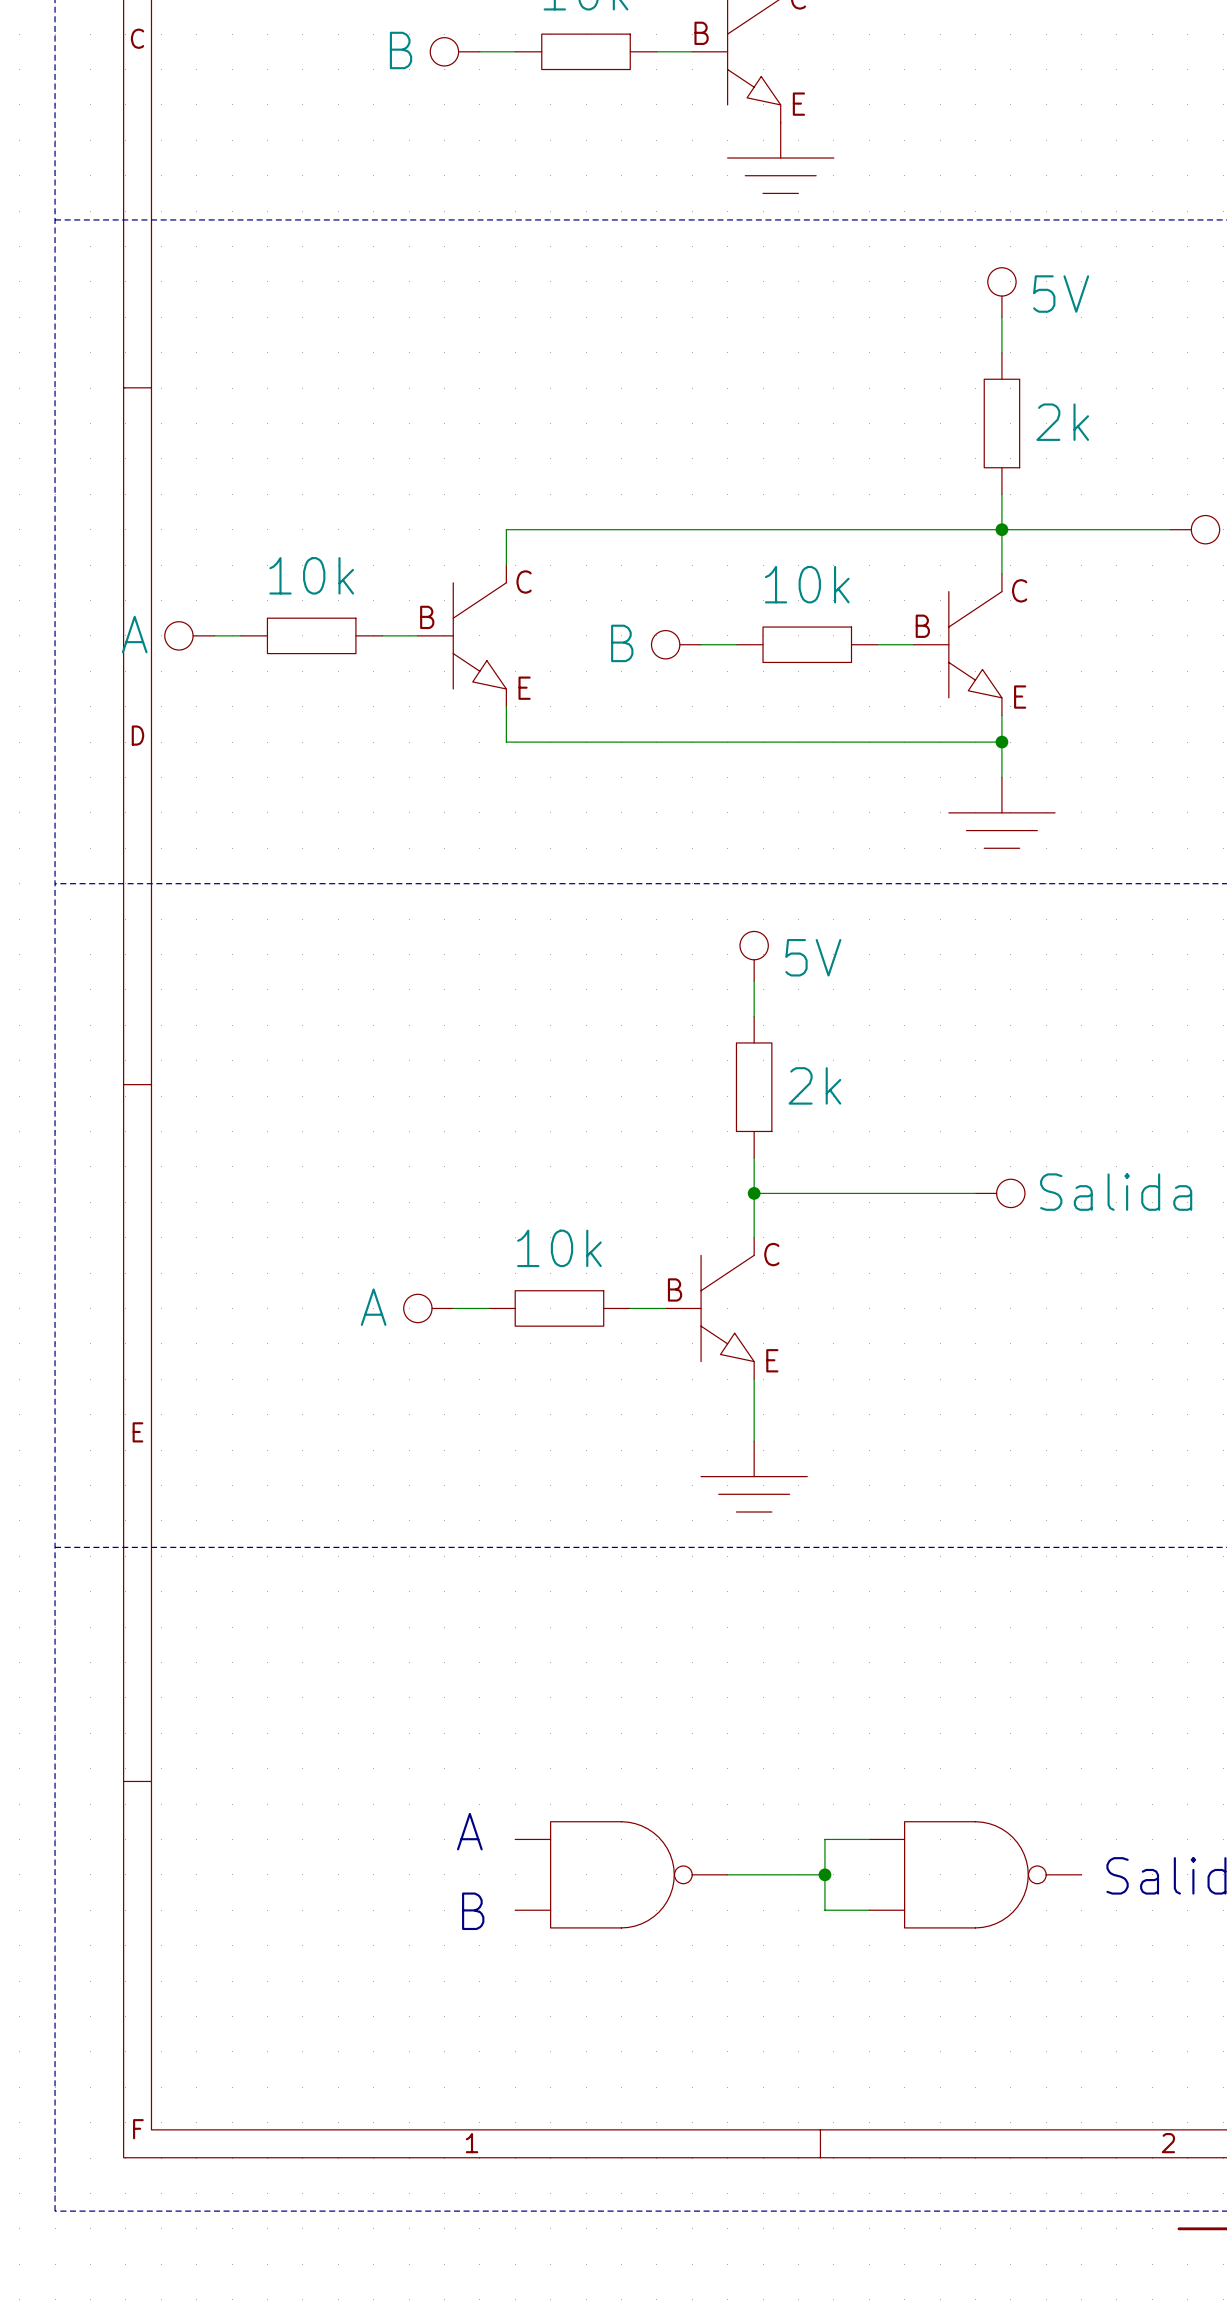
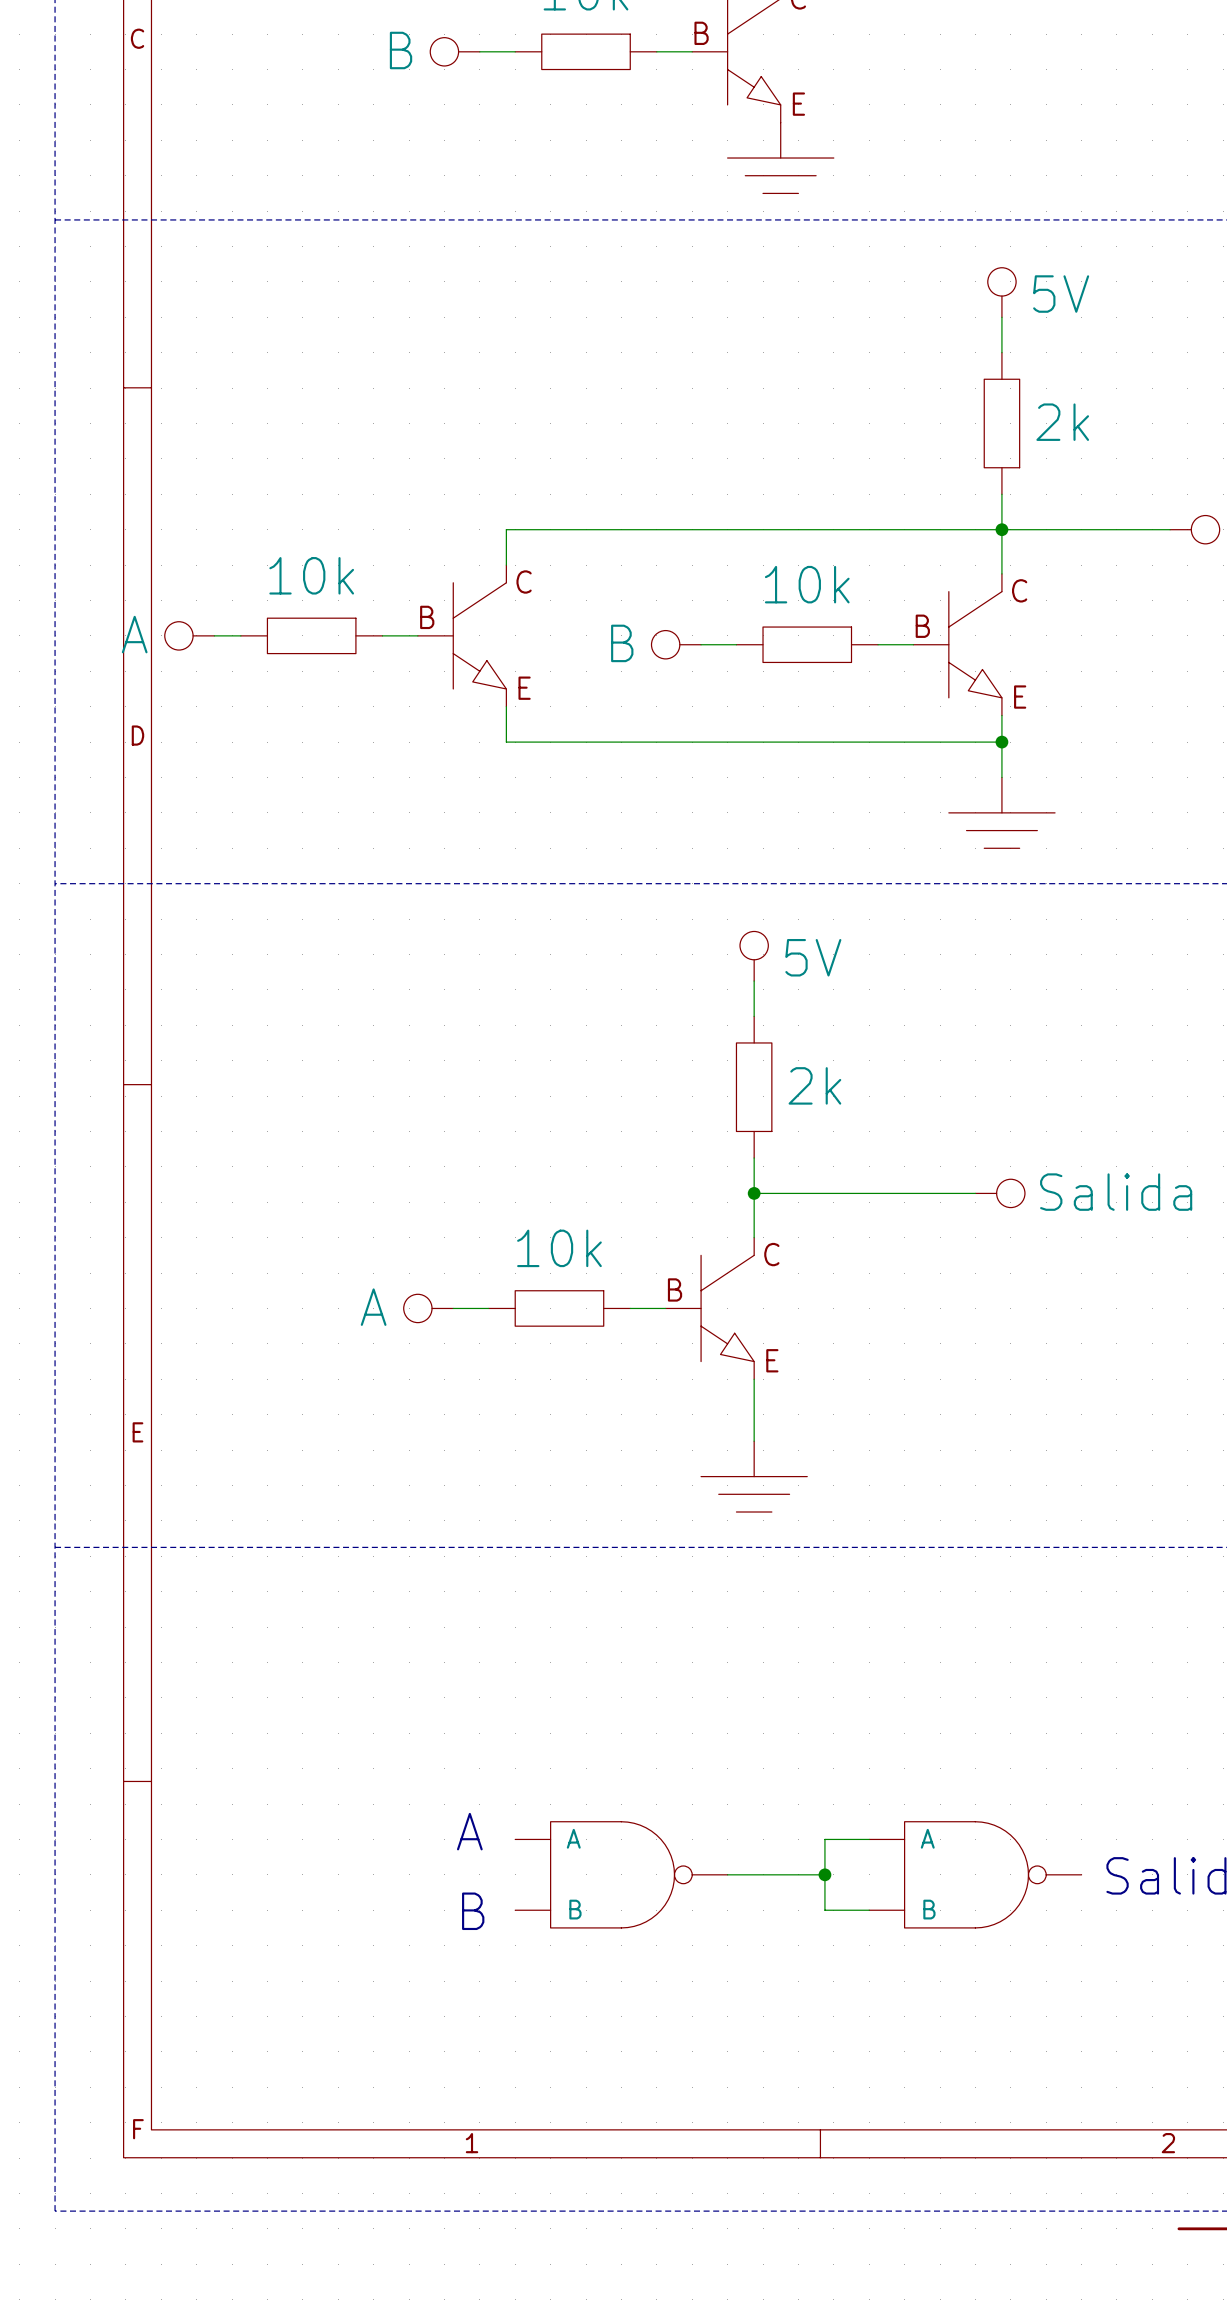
part symbol: [515, 1821, 728, 1928] -> [515, 1821, 728, 1928]
part symbol: [869, 1821, 1082, 1928] -> [869, 1821, 1082, 1928]

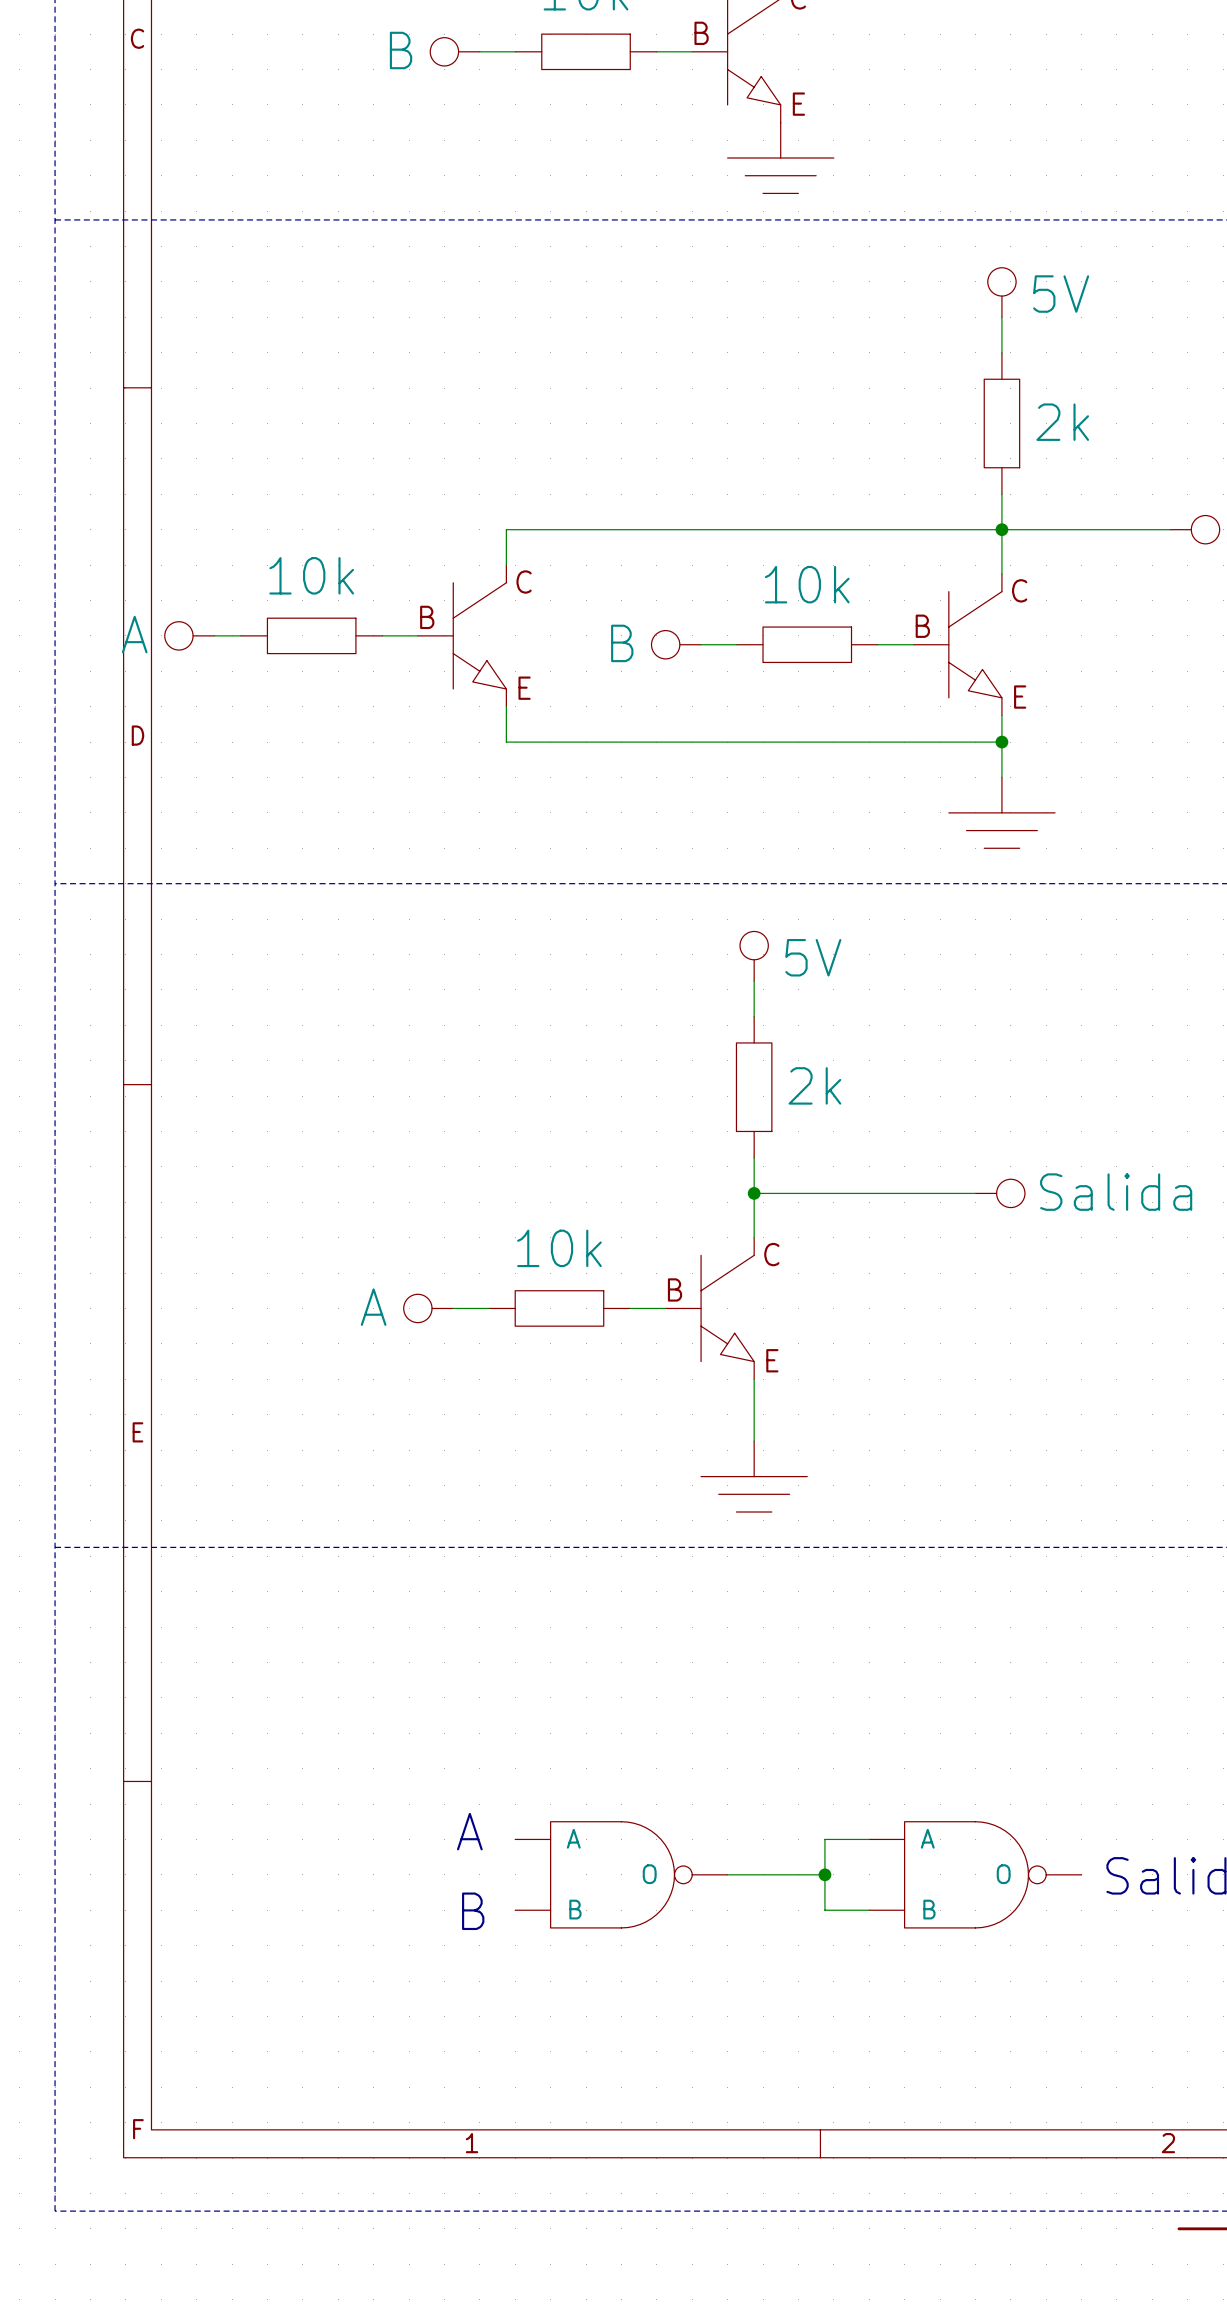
part pin name: none -> O (649, 1874)
part pin name: none -> O (1003, 1874)

